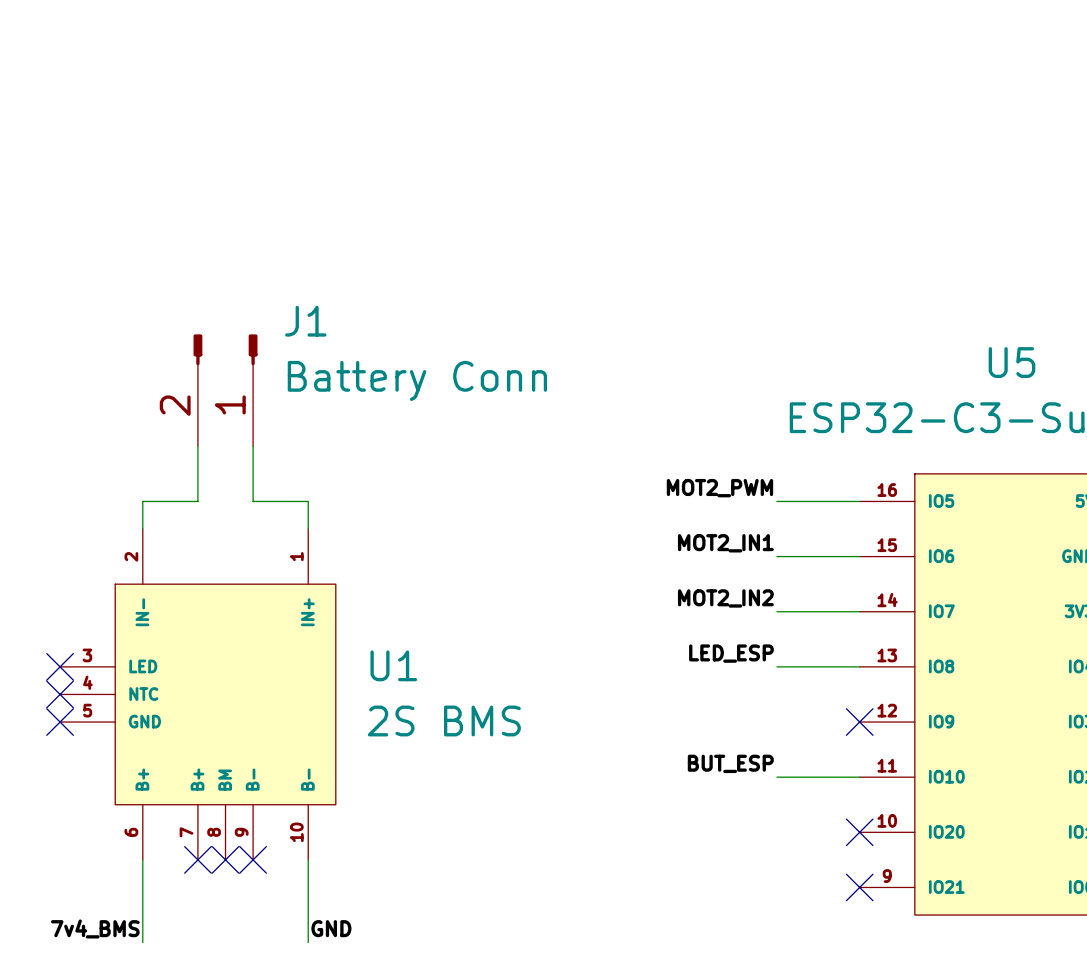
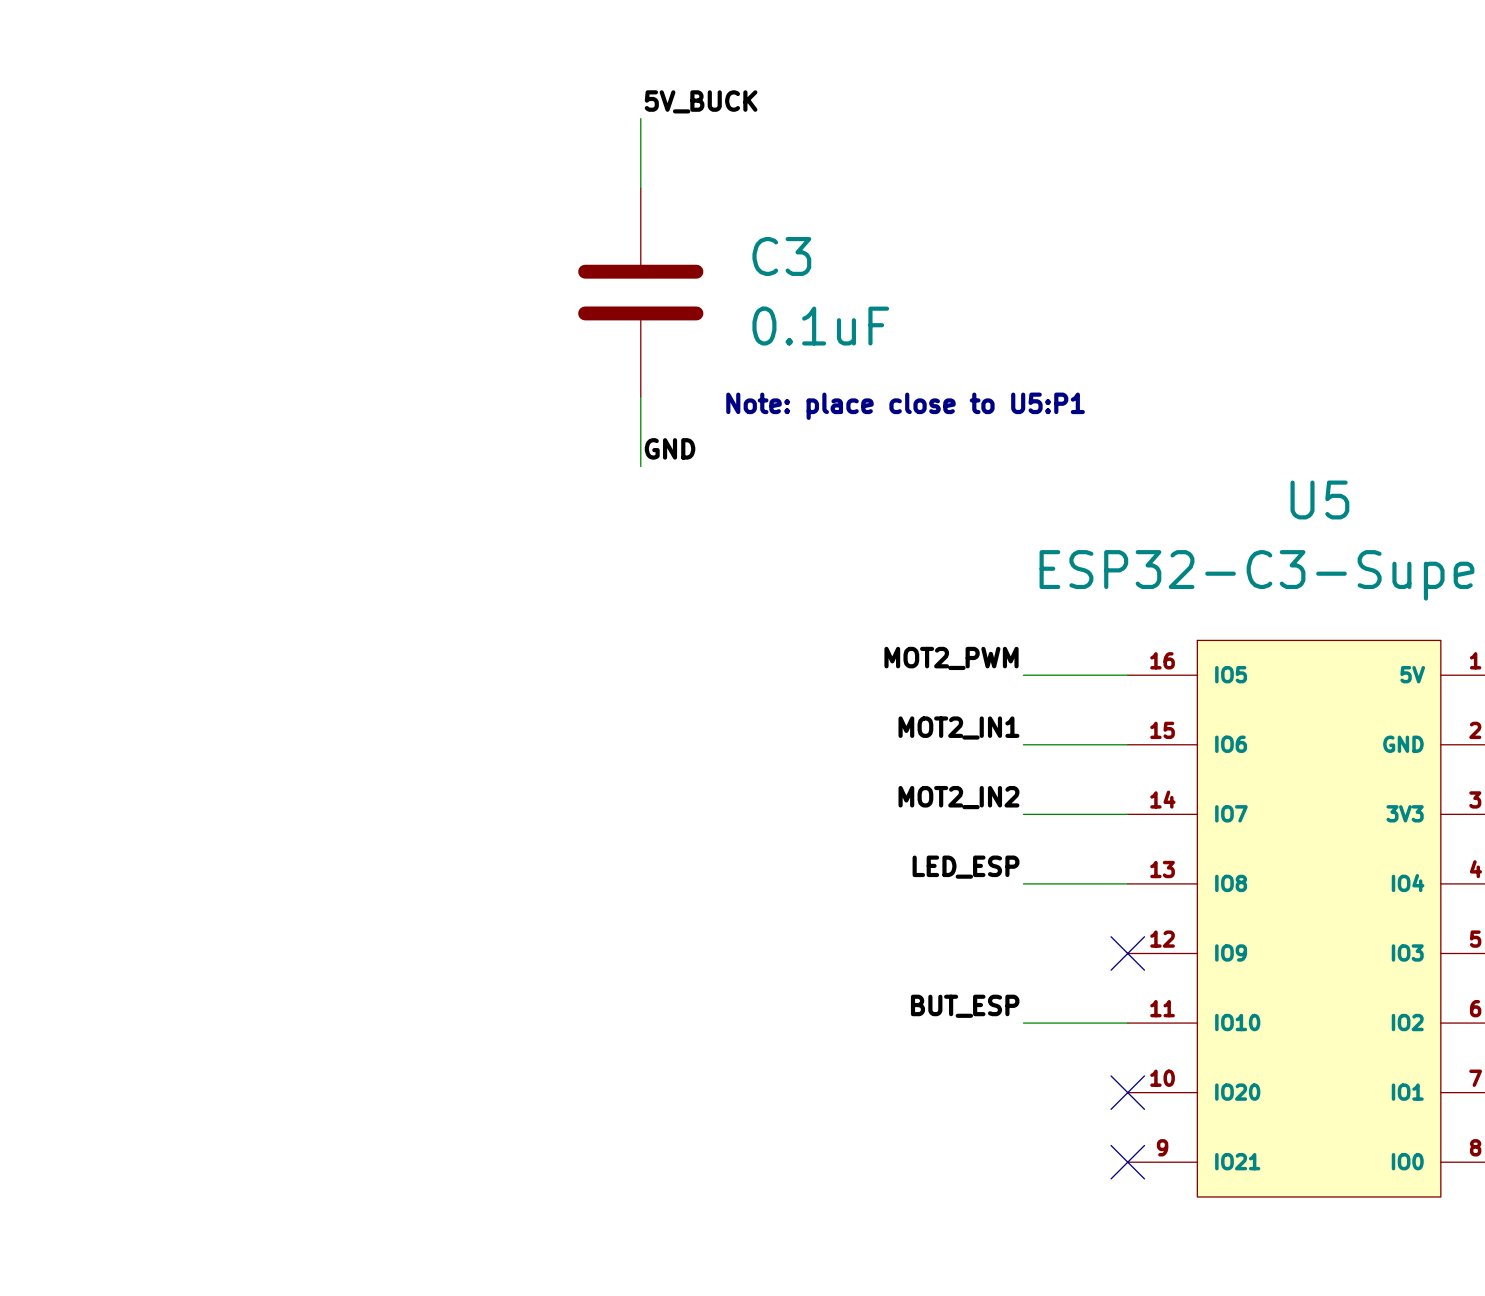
label: none -> 5V_BUCK (701, 101)
wire: none -> (640, 118) (640, 188)
C3: none -> 0.1uF (640, 292)
wire: none -> (640, 396) (640, 466)
text: none -> Note: place close to U5:P1 (905, 406)
label: none -> GND (670, 448)
J1: Battery Conn (225, 390) -> none
wire: (197, 446) (197, 501) (142, 501) (142, 529) -> none
wire: (253, 446) (253, 501) (308, 501) (308, 529) -> none
no-connect mark: (60, 666) -> none
no-connect mark: (60, 694) -> none
U1: 2S BMS (197, 694) -> none
no-connect mark: (60, 722) -> none
wire: (142, 859) (142, 942) -> none
no-connect mark: (197, 859) -> none
no-connect mark: (225, 859) -> none
no-connect mark: (253, 859) -> none
wire: (308, 859) (308, 942) -> none
label: 7v4_BMS (95, 928) -> none
label: GND (331, 928) -> none

